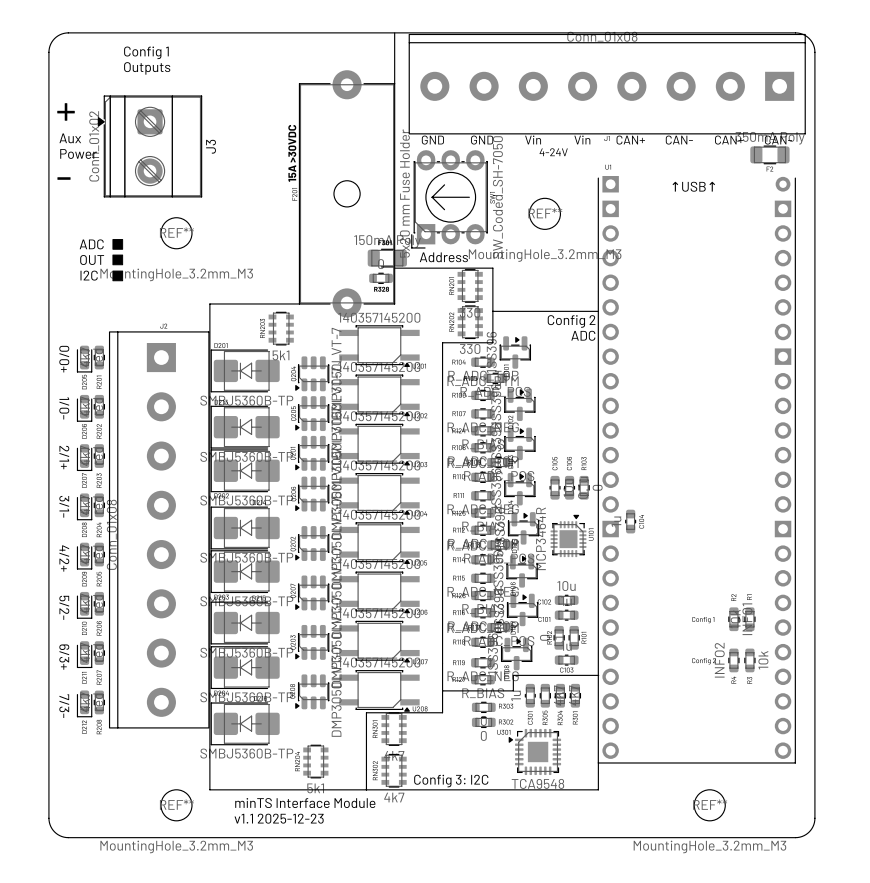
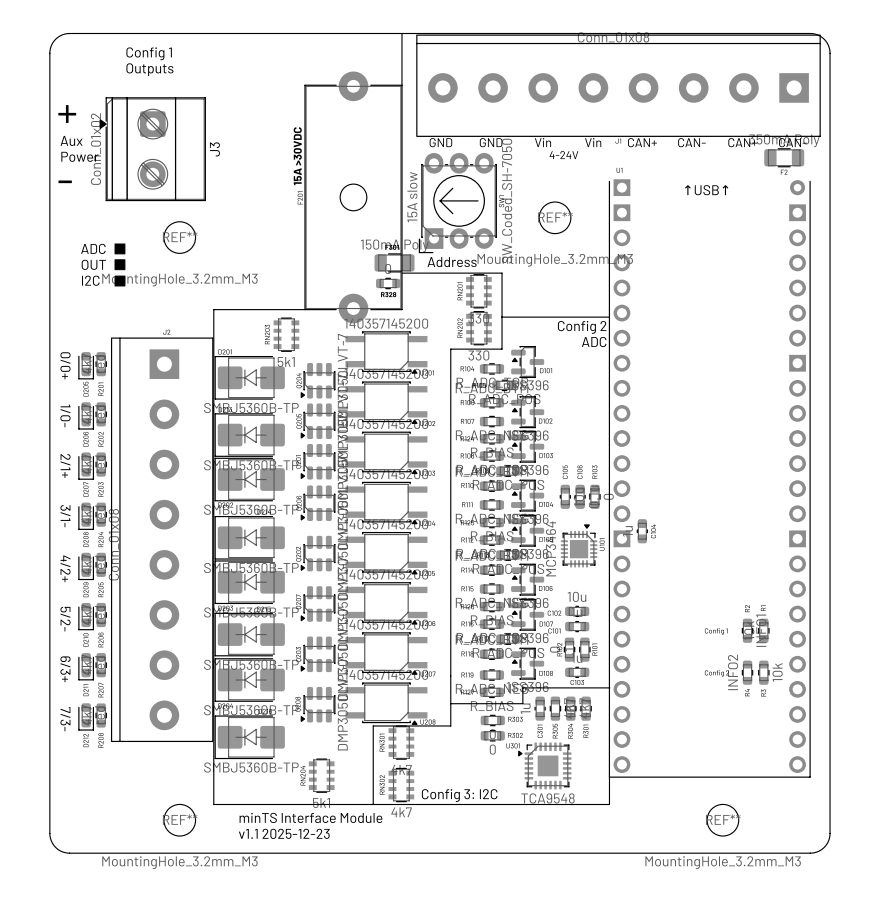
part value: 5x20 mm Fuse Holder (404, 193) -> 15A slow (412, 197)
part rotation: 0° (515, 352) -> 90° counterclockwise (527, 362)
part rotation: 0° (519, 404) -> 90° counterclockwise (527, 412)
part rotation: 0° (519, 443) -> 90° counterclockwise (527, 446)
part rotation: 0° (519, 489) -> 90° counterclockwise (527, 495)
part rotation: 0° (523, 528) -> 90° counterclockwise (527, 530)
part value: MCP3464R (541, 538) -> MCP3464 (551, 548)
part rotation: 0° (522, 571) -> 90° counterclockwise (527, 579)
part rotation: 0° (522, 609) -> 90° counterclockwise (527, 614)
part rotation: 0° (516, 654) -> 90° counterclockwise (527, 663)

